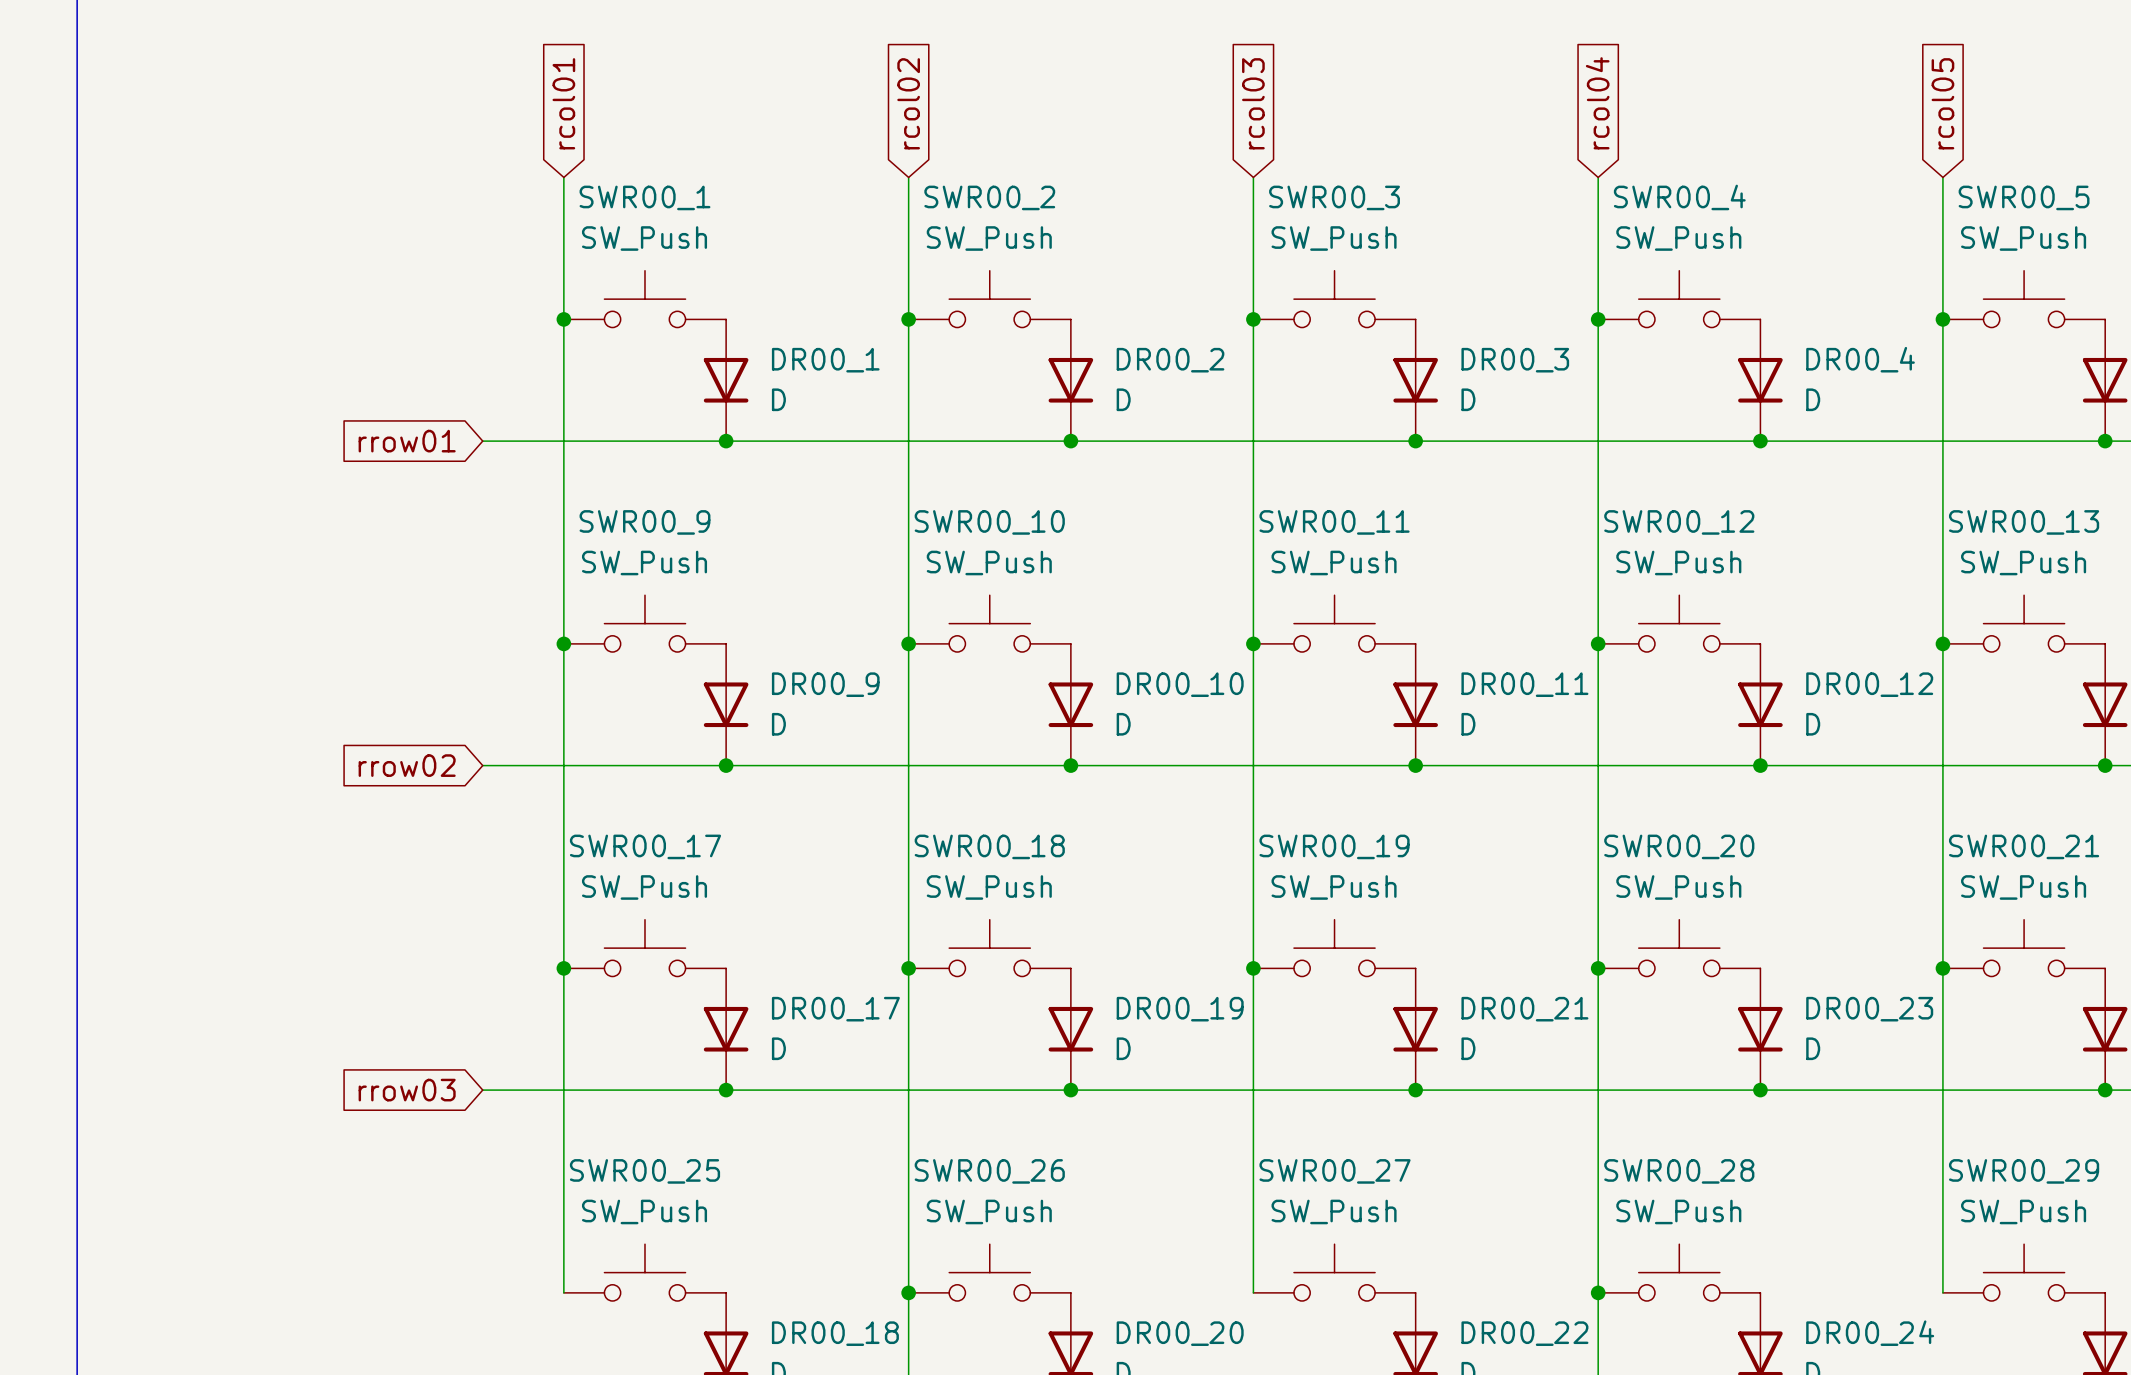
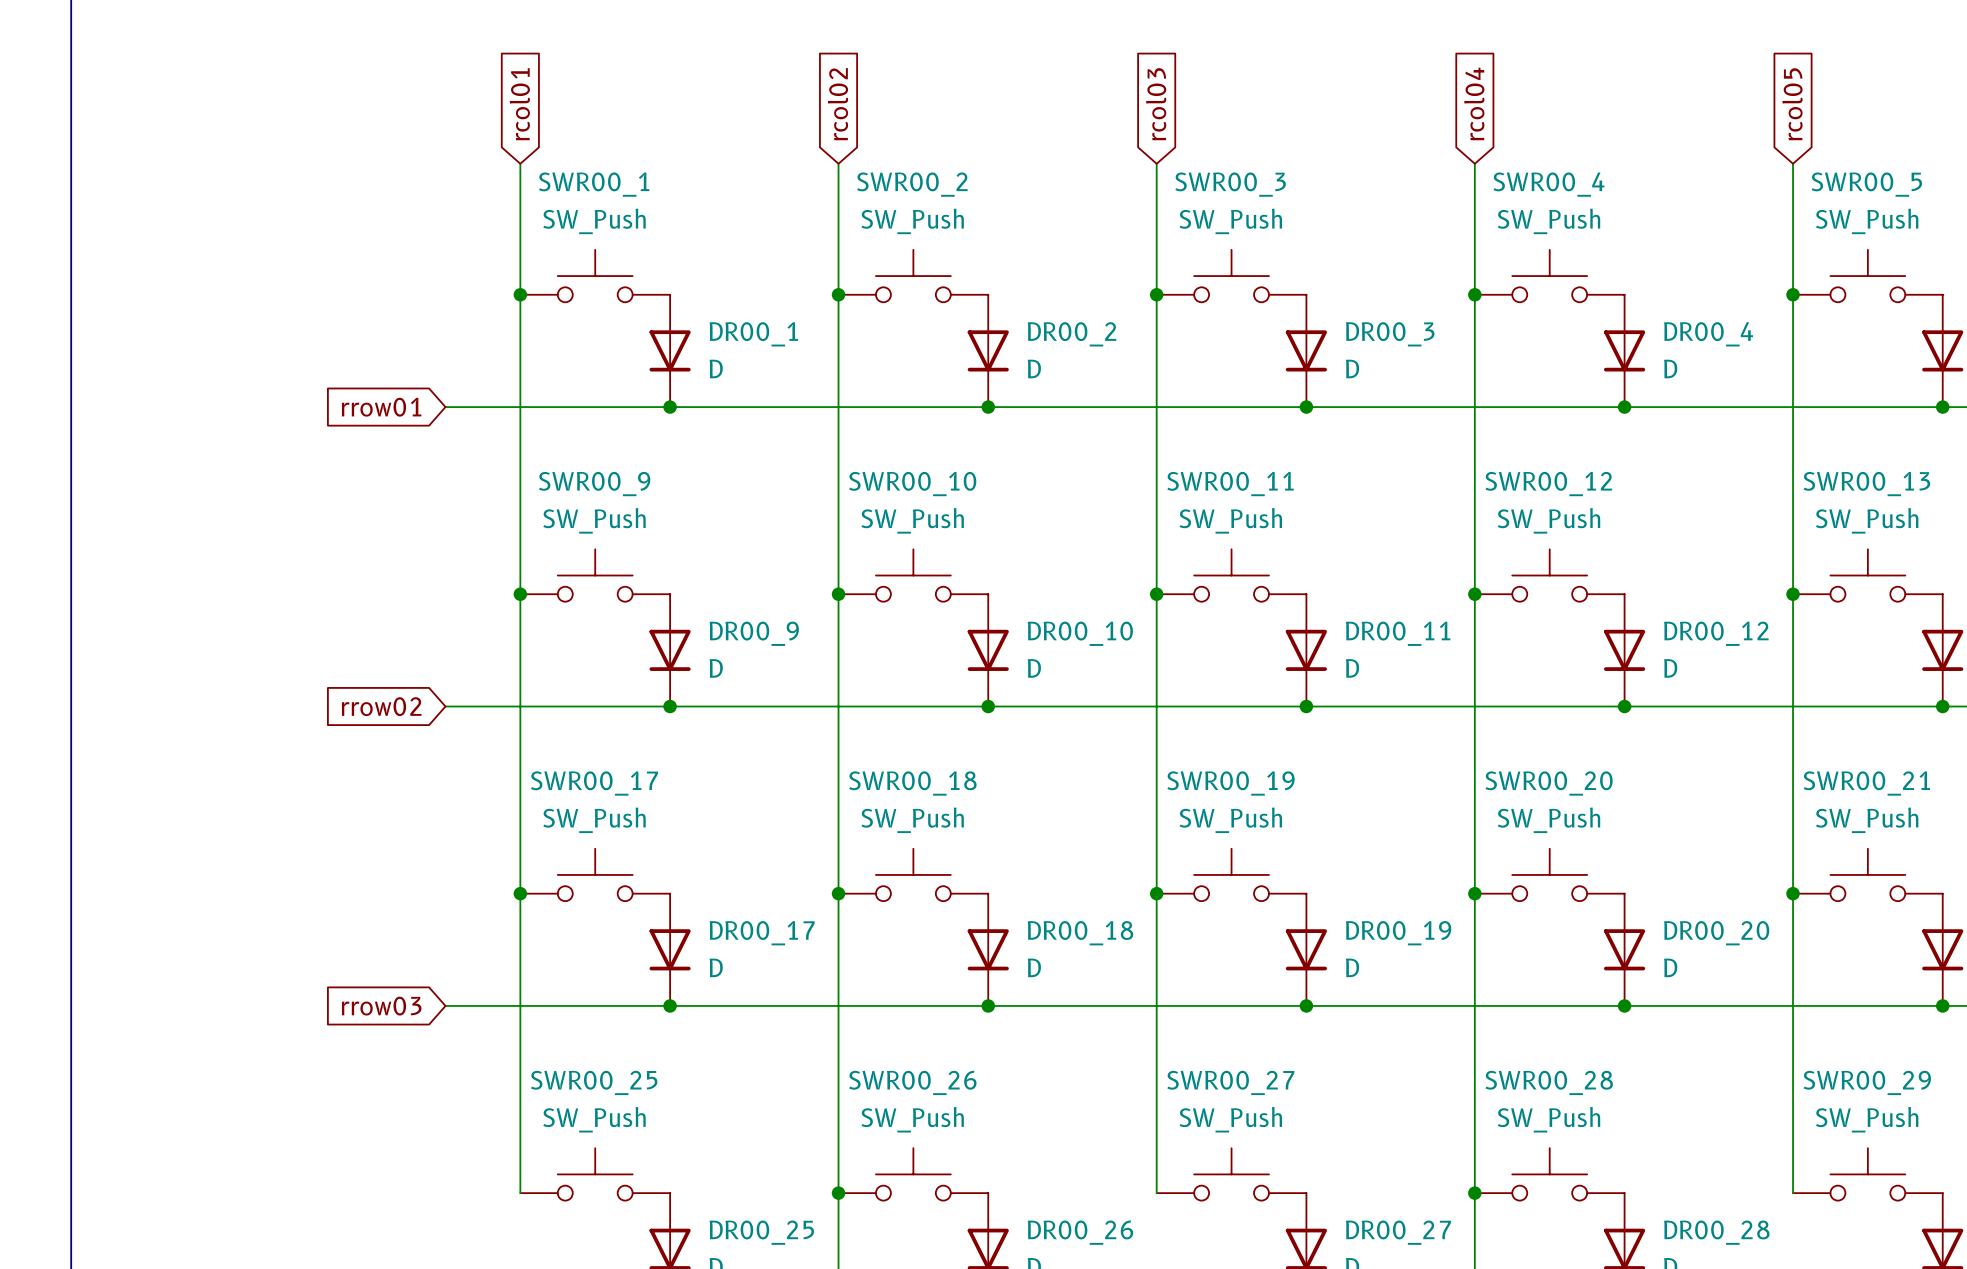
DR00_19 name: DR00_19 (1180, 1009) -> DR00_18 (1080, 933)
DR00_21 name: DR00_21 (1524, 1009) -> DR00_19 (1398, 933)
DR00_23 name: DR00_23 (1869, 1009) -> DR00_20 (1716, 933)
DR00_18 name: DR00_18 (835, 1333) -> DR00_25 (761, 1232)
DR00_20 name: DR00_20 (1180, 1333) -> DR00_26 (1080, 1232)
DR00_22 name: DR00_22 (1524, 1333) -> DR00_27 (1398, 1232)
DR00_24 name: DR00_24 (1870, 1333) -> DR00_28 (1716, 1232)

